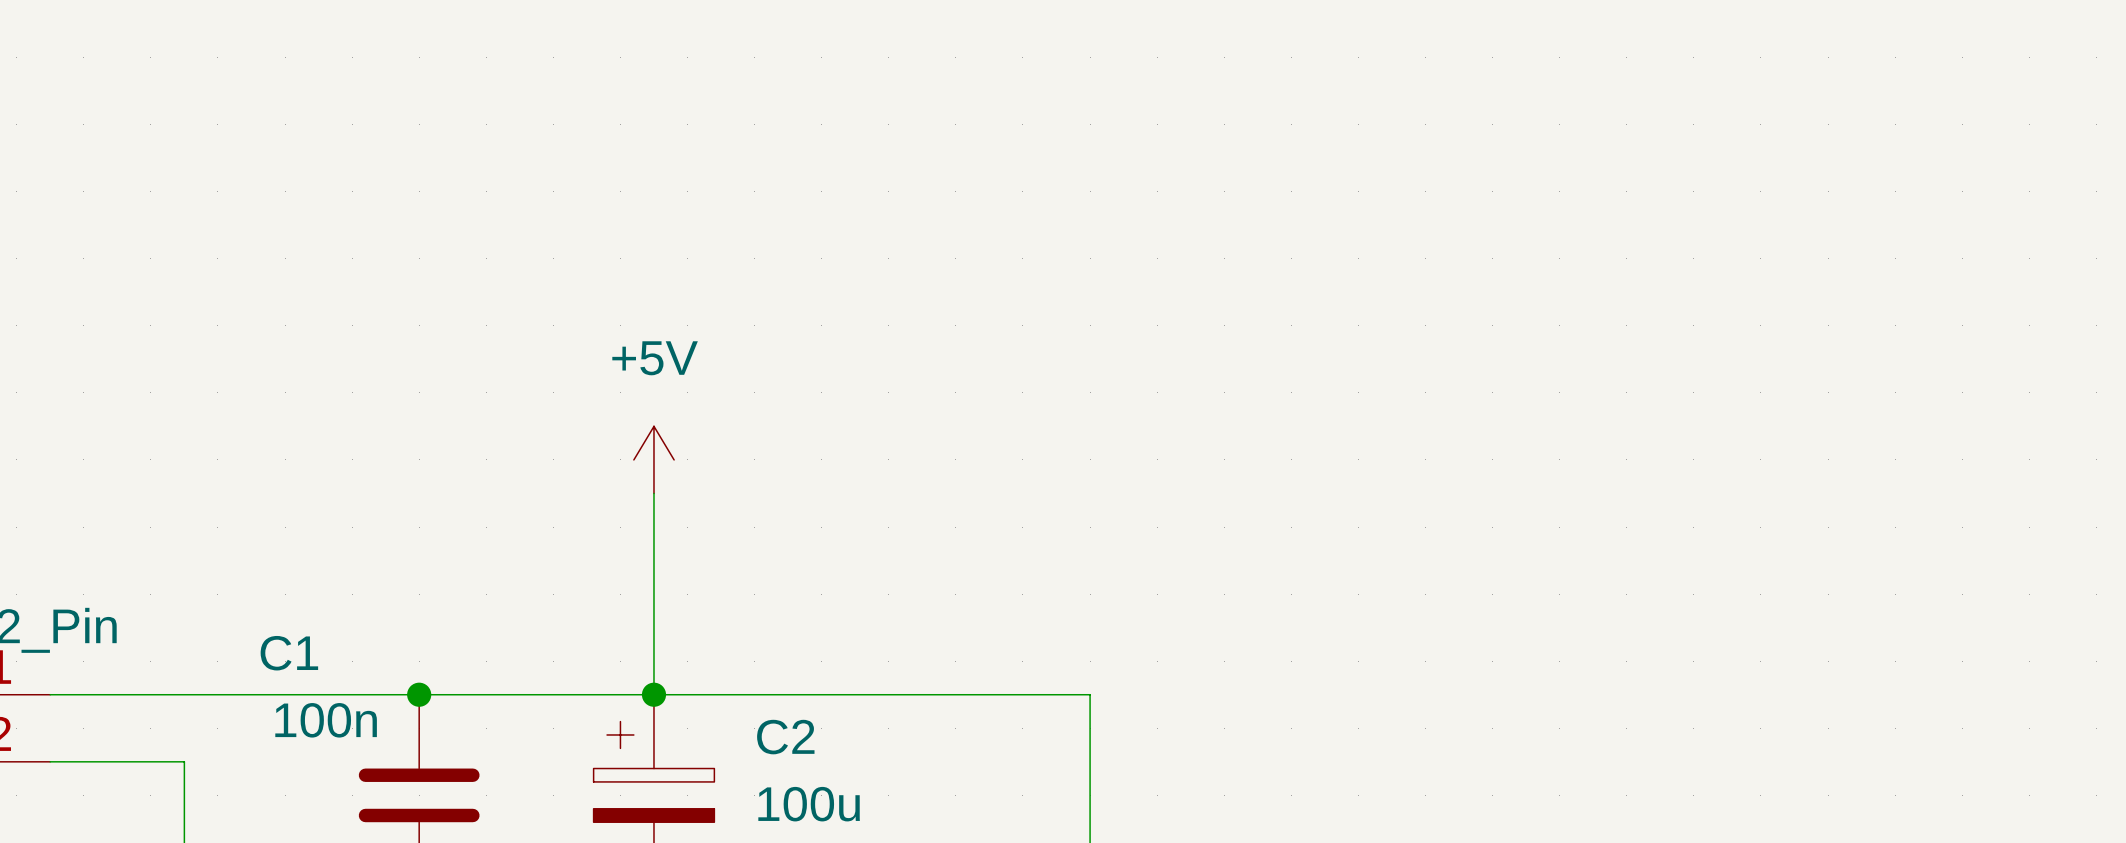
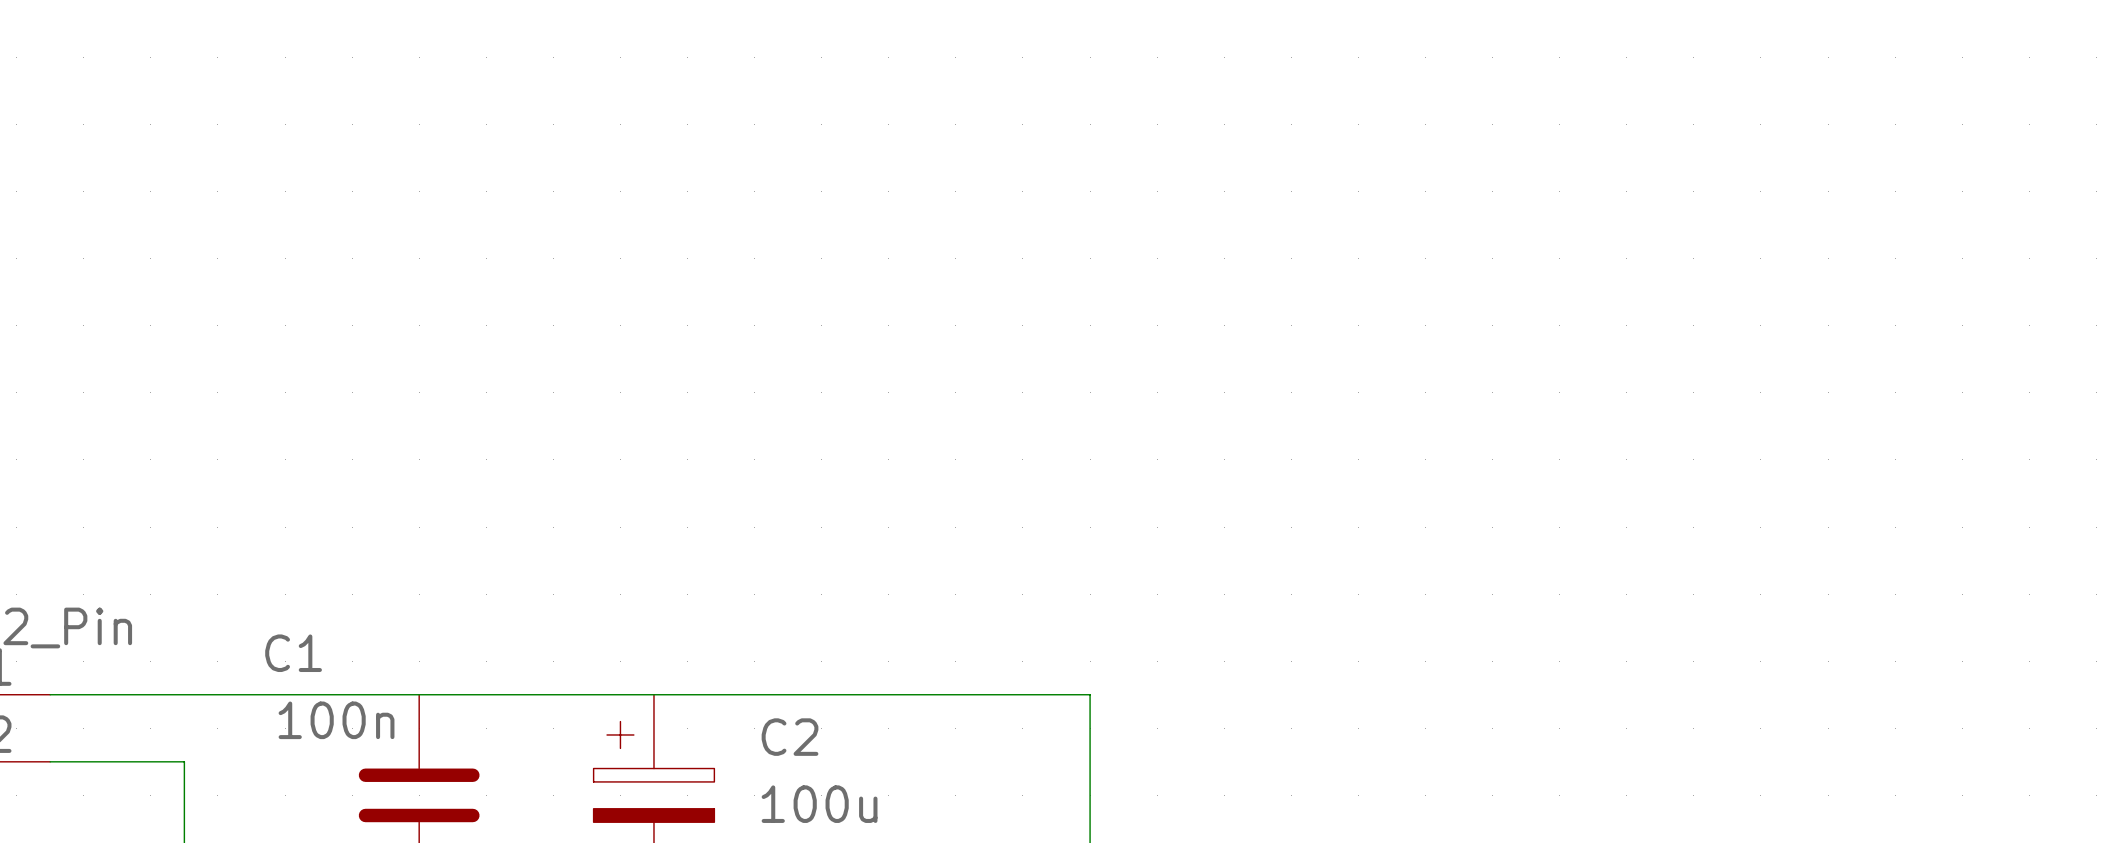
power symbol: +5V (653, 459) -> none
wire: (653, 493) (653, 694) -> none
junction: (419, 694) -> none
junction: (653, 694) -> none

